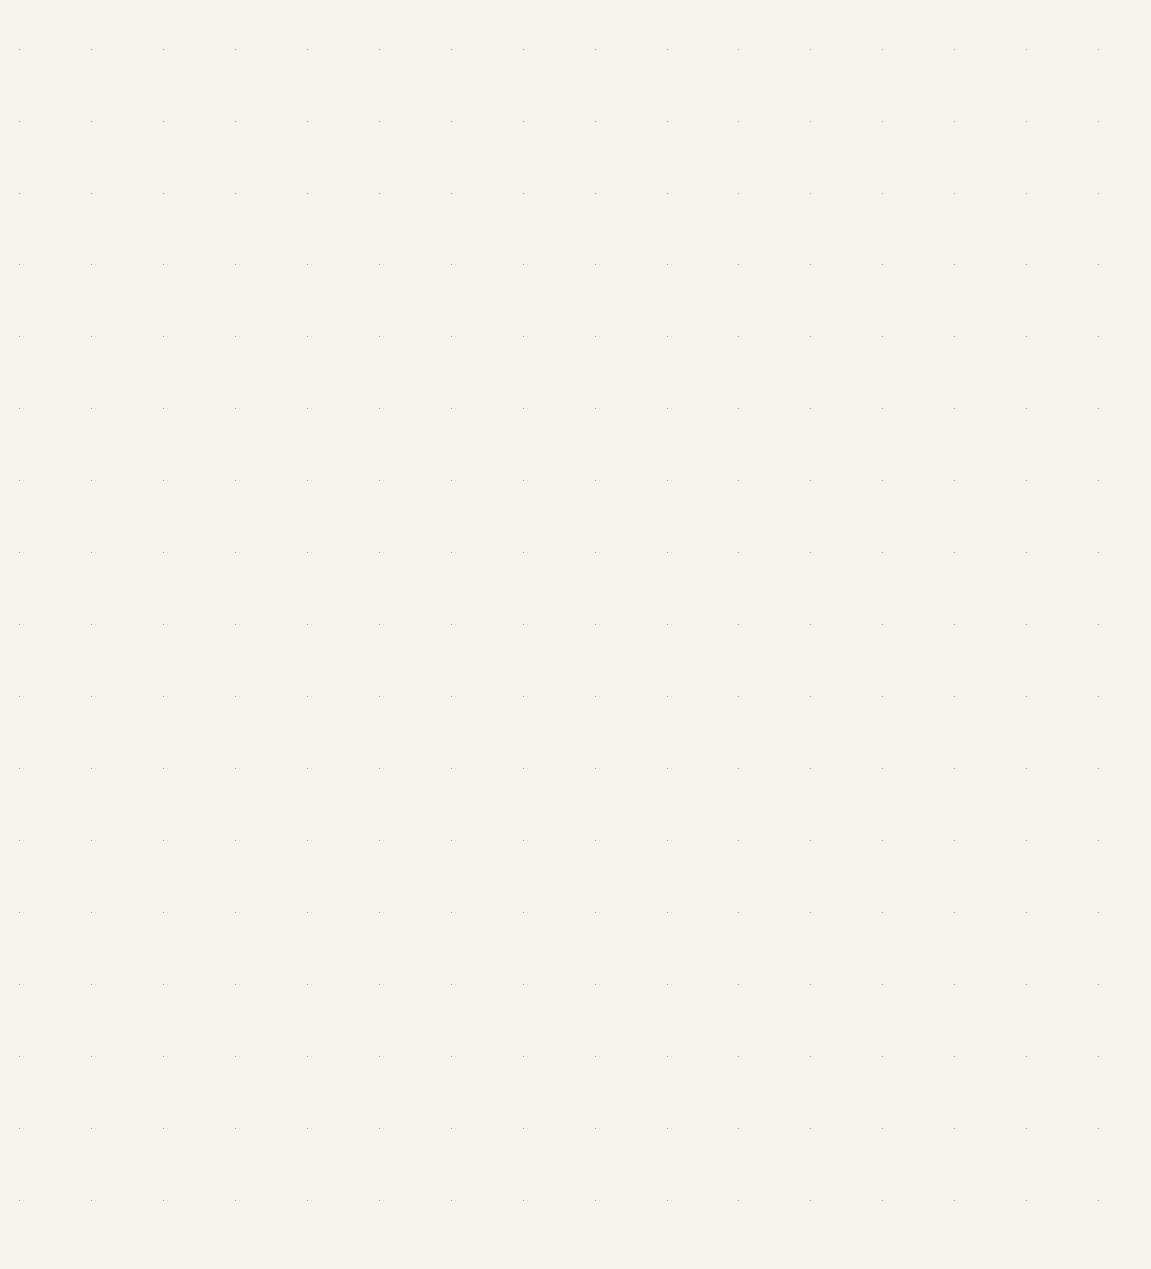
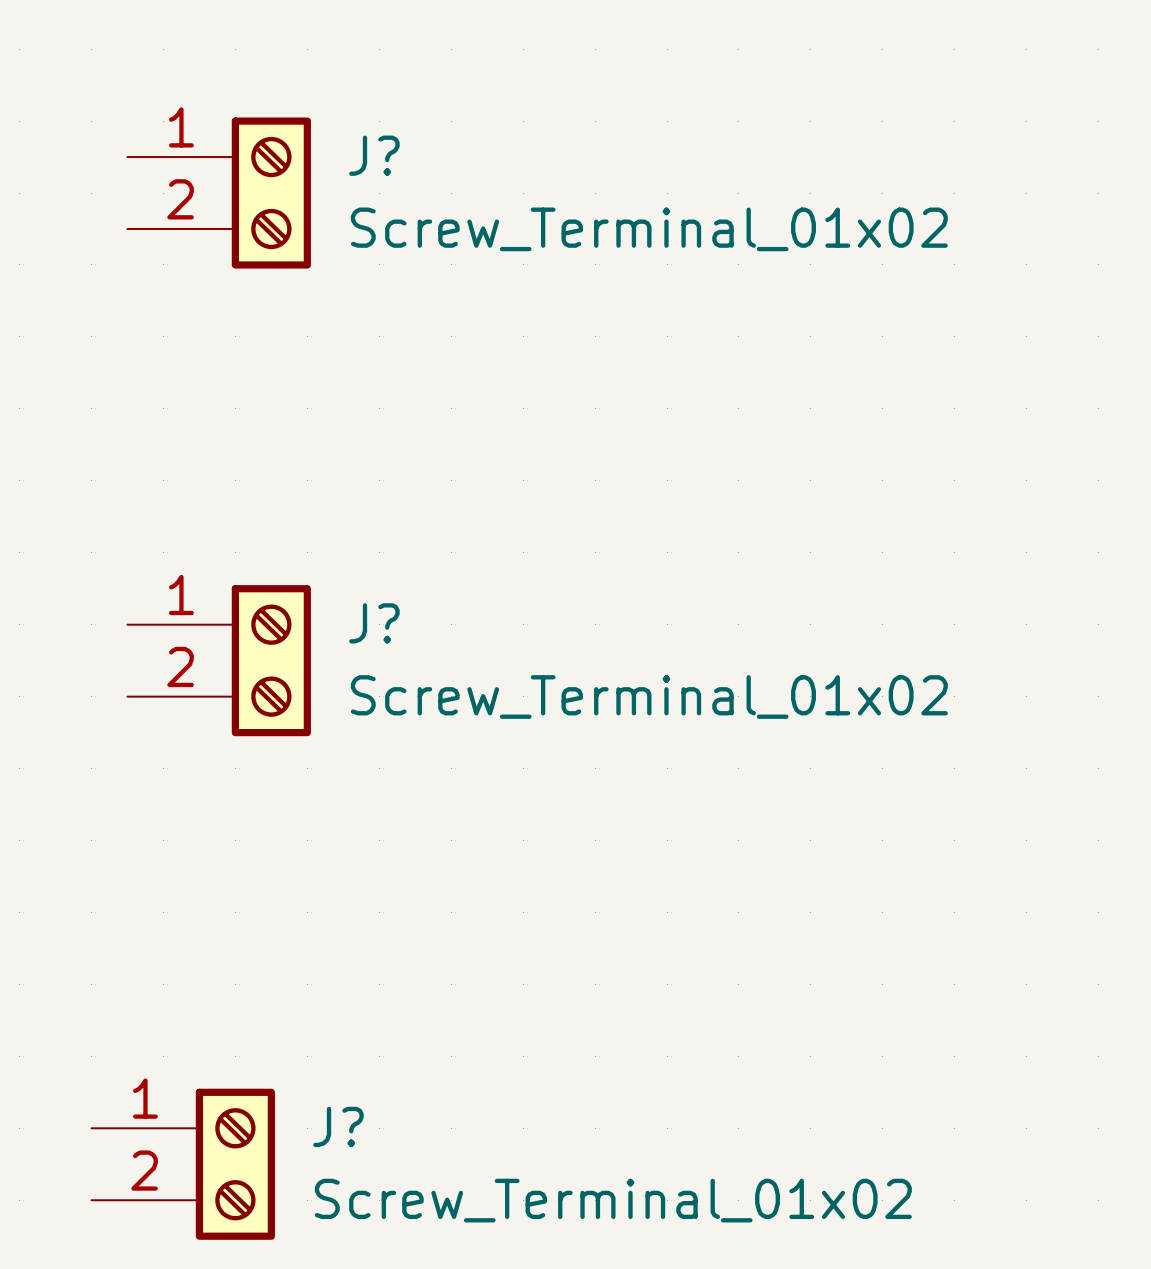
J?: none -> Screw_Terminal_01x02 (219, 193)
J?: none -> Screw_Terminal_01x02 (219, 660)
J?: none -> Screw_Terminal_01x02 (183, 1164)

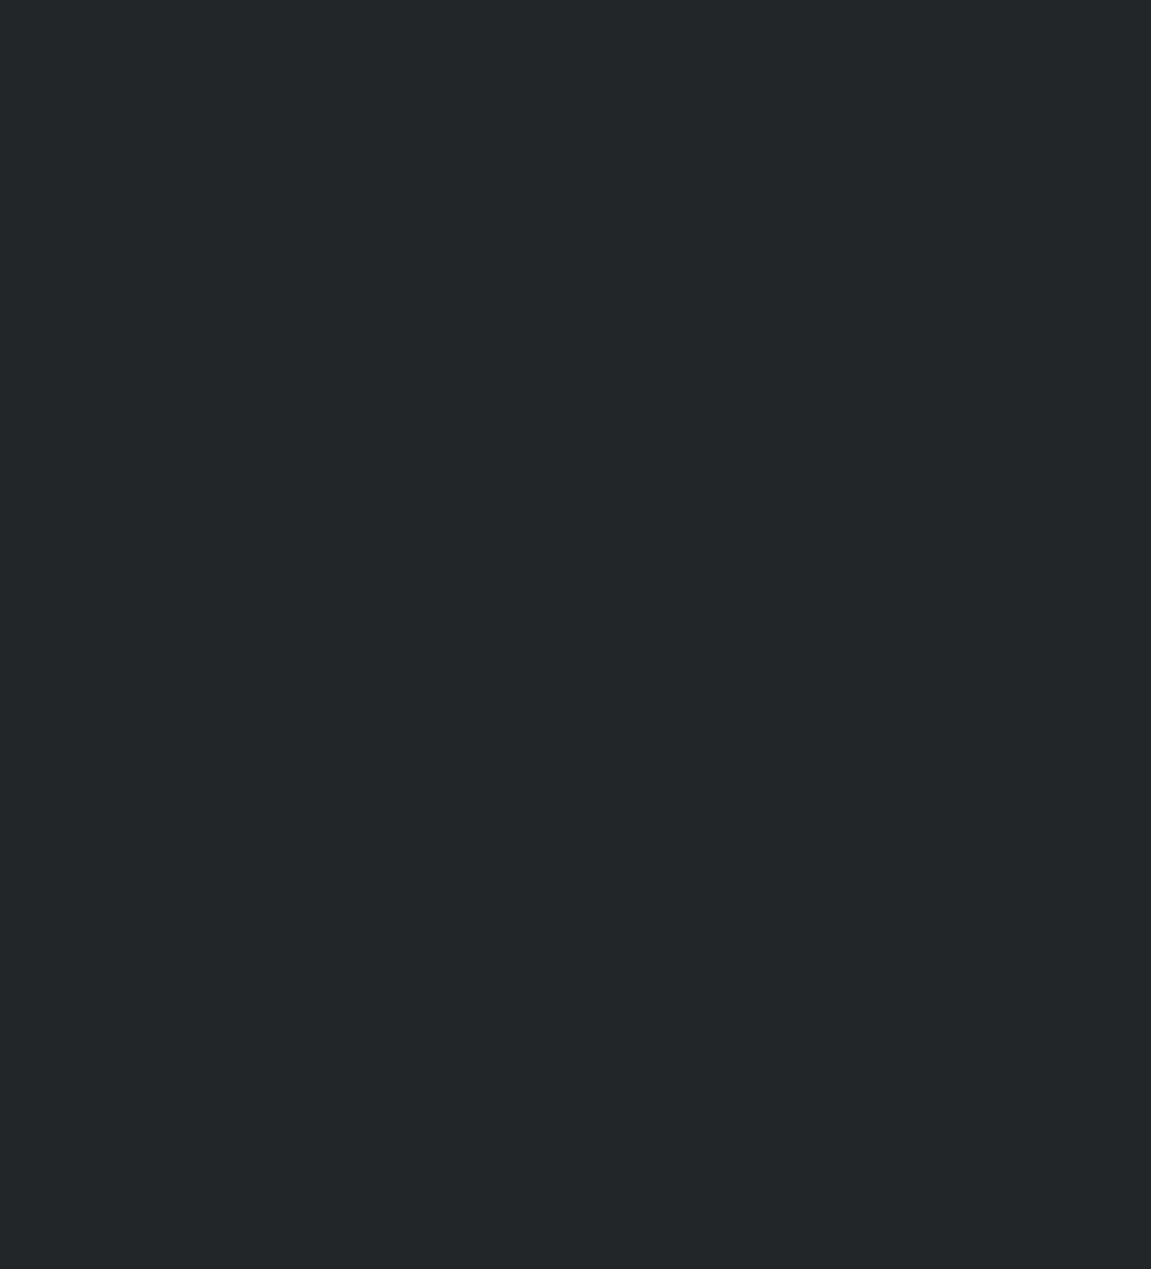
J?: Screw_Terminal_01x02 (219, 193) -> none
J?: Screw_Terminal_01x02 (219, 660) -> none
J?: Screw_Terminal_01x02 (183, 1164) -> none

